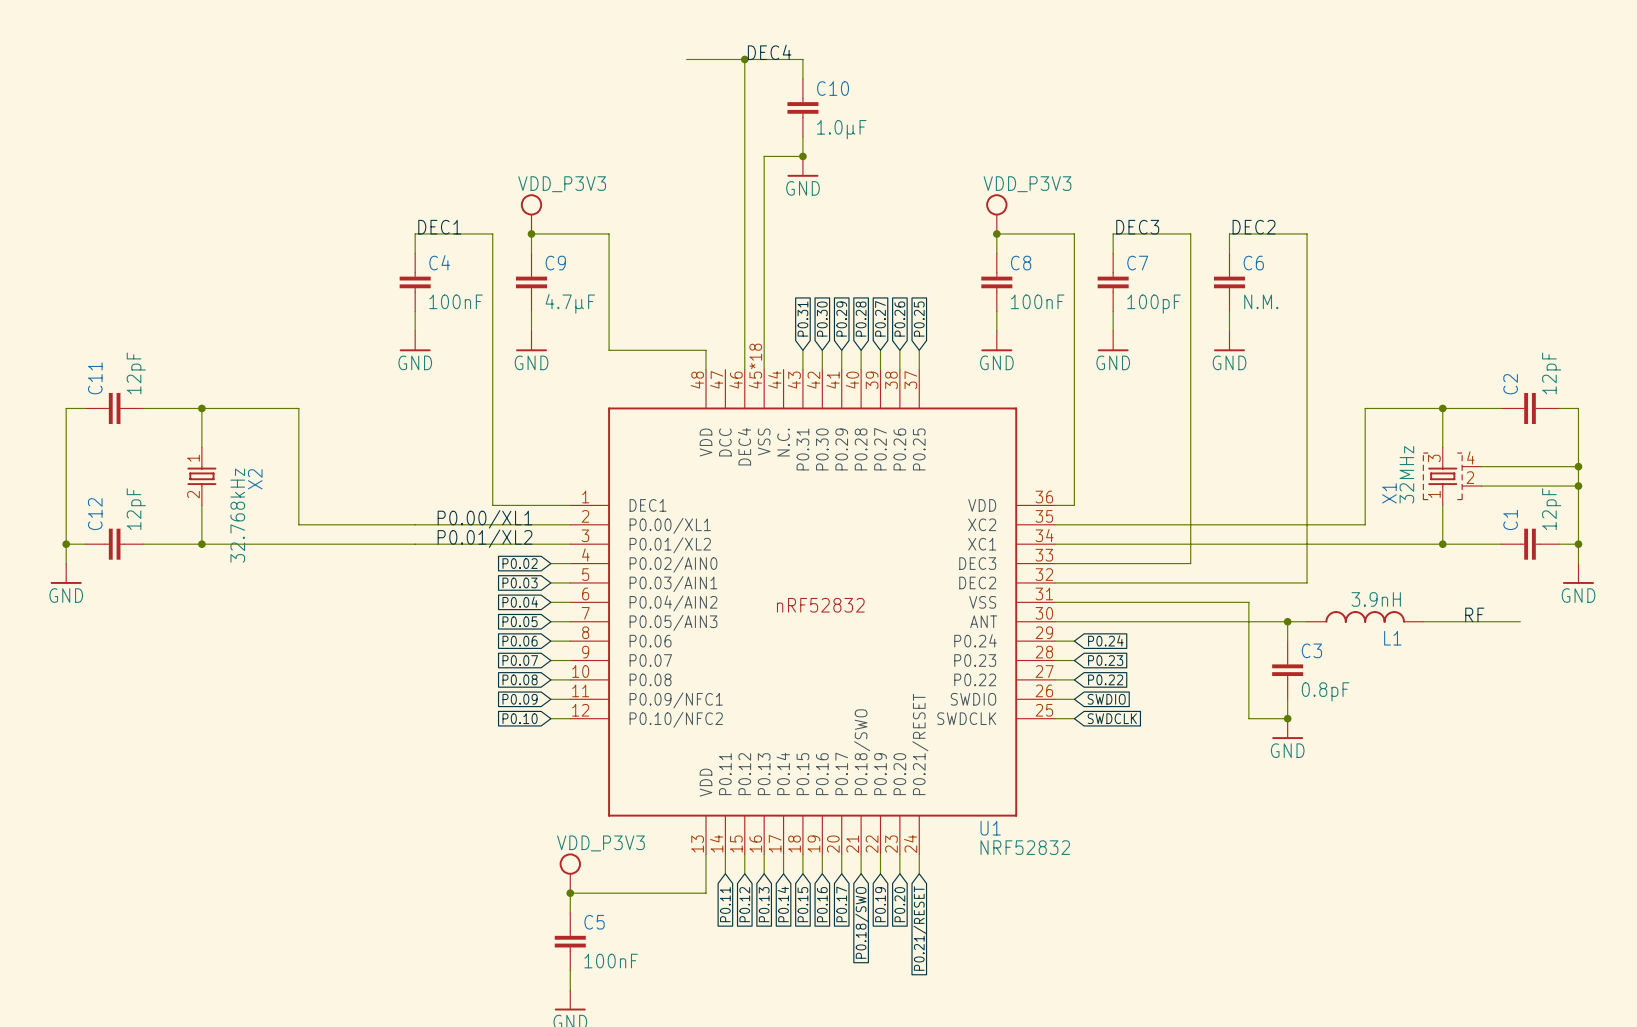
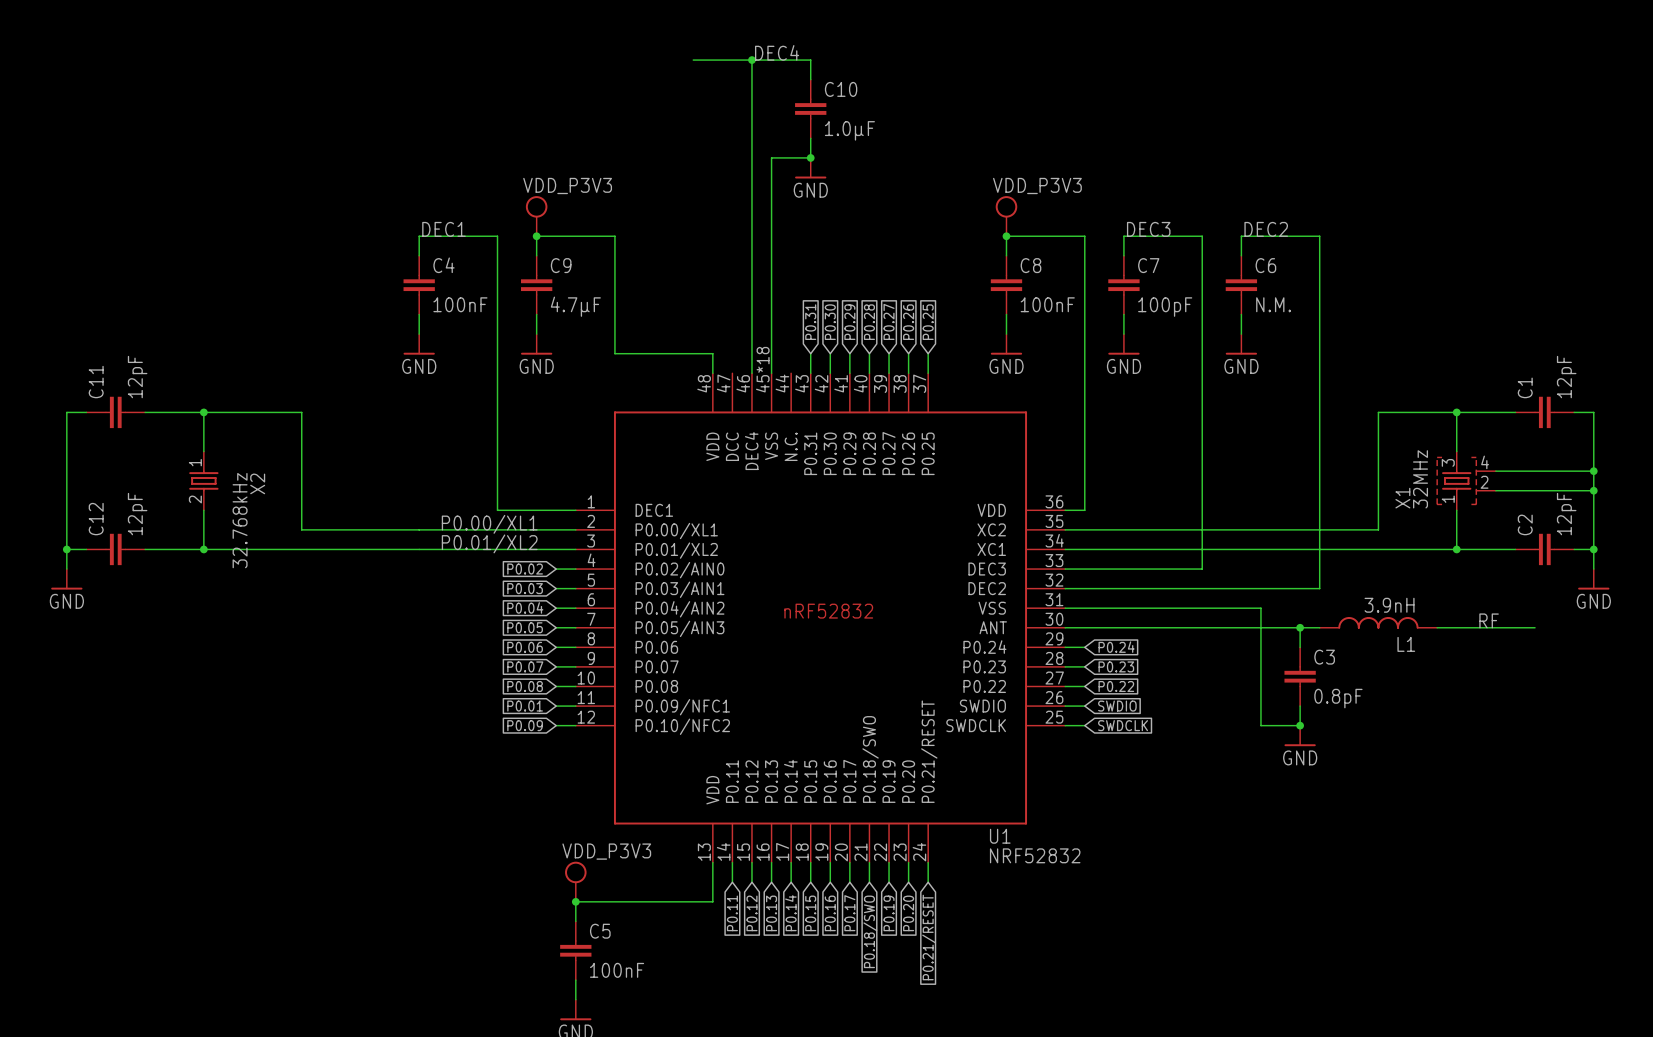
C2 name: C2 (1510, 384) -> C1 (1525, 387)
C1 name: C1 (1510, 519) -> C2 (1525, 524)
global label: P0.09 (520, 699) -> P0.01 (525, 706)
global label: P0.10 (520, 718) -> P0.09 (525, 725)

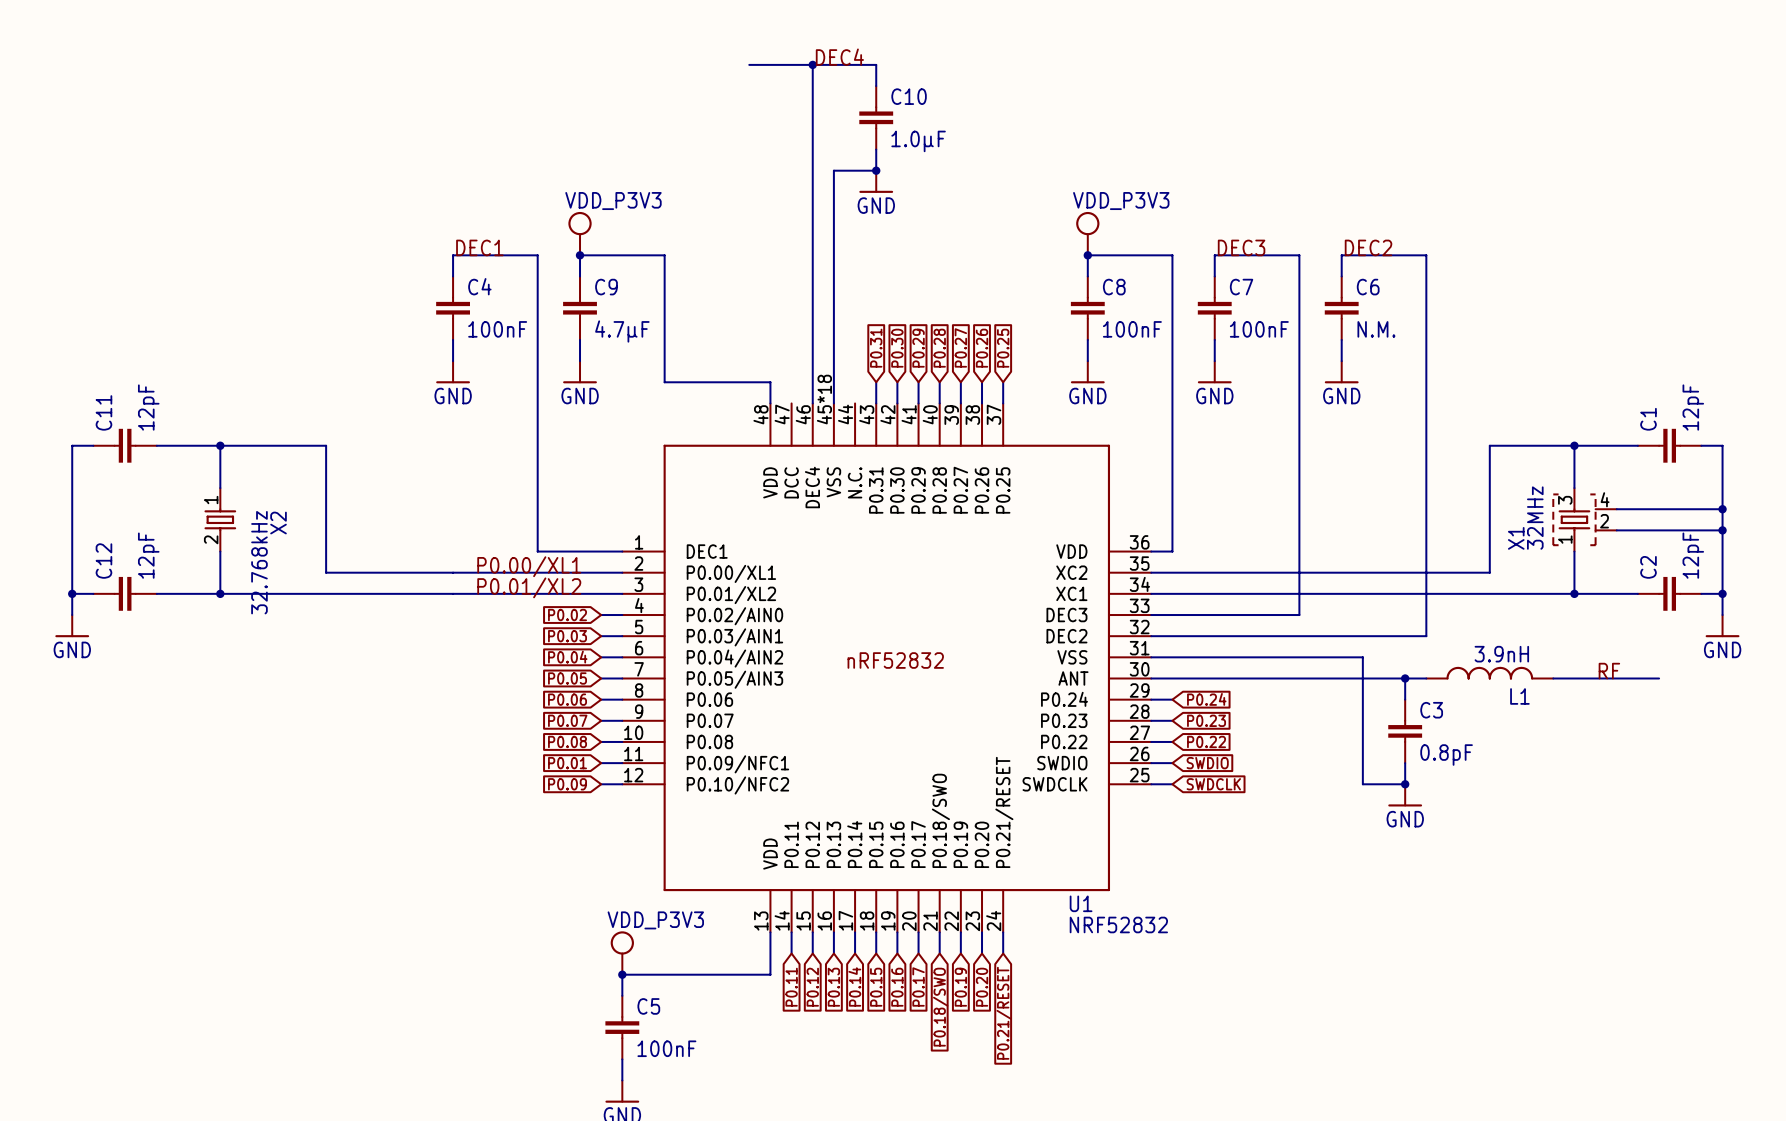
C7 value: 100pF (1165, 307) -> 100nF (1259, 329)

